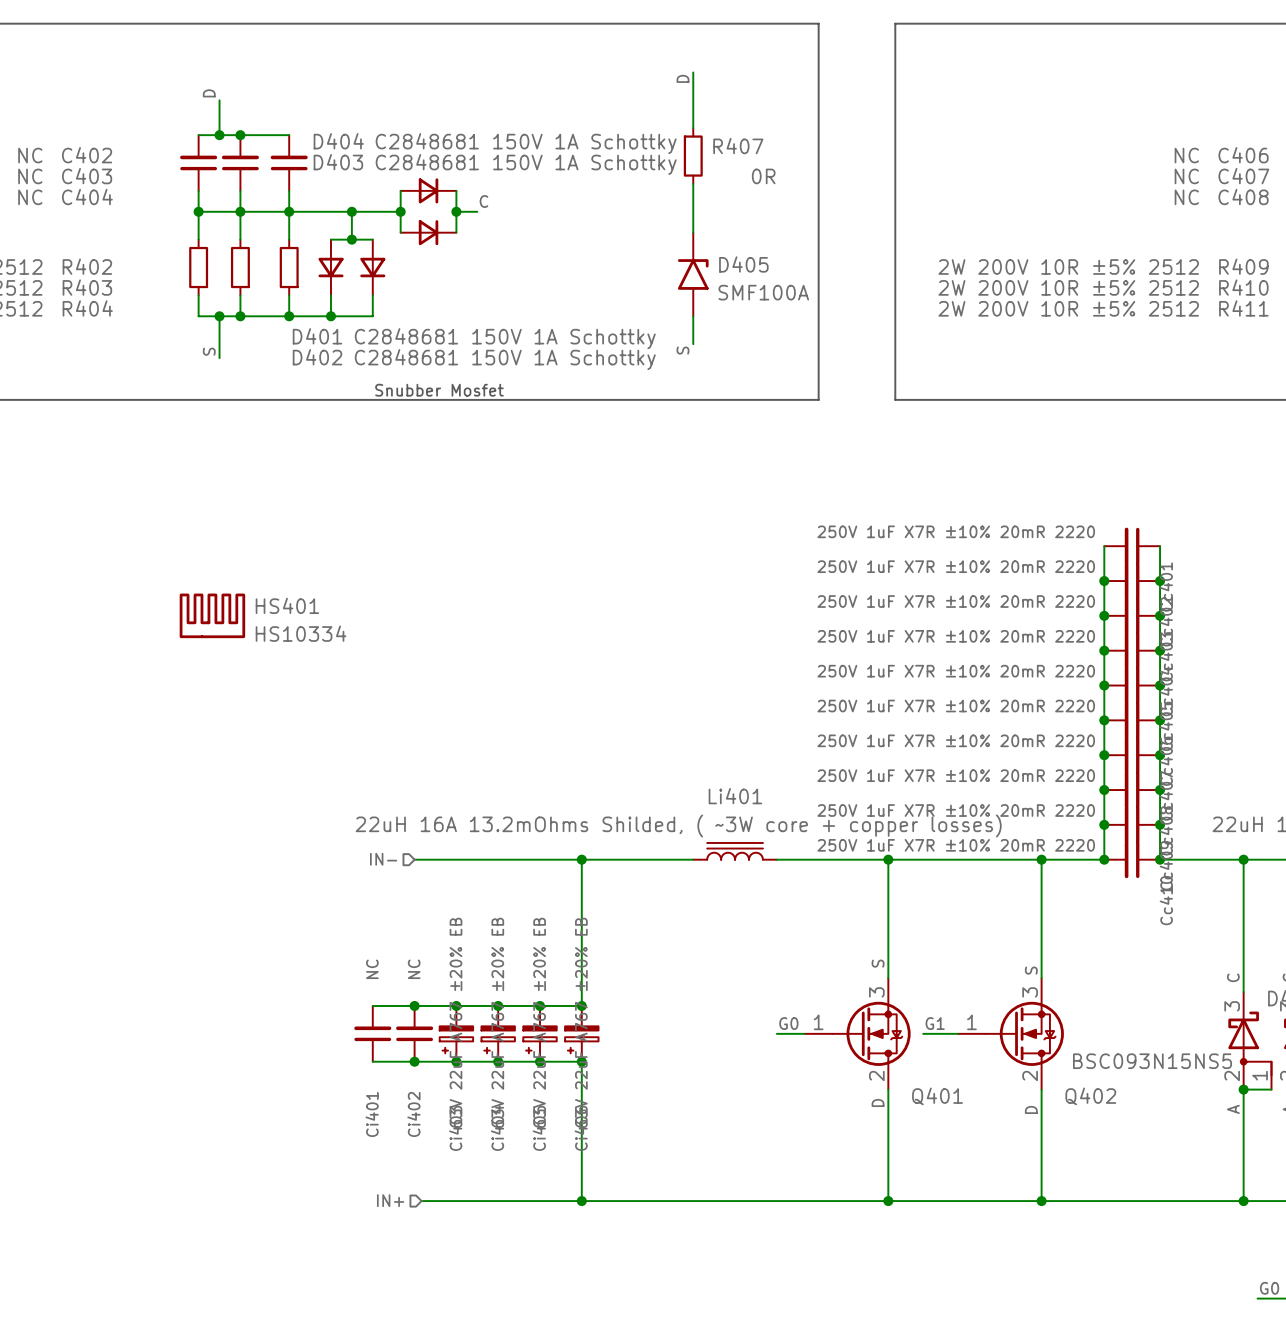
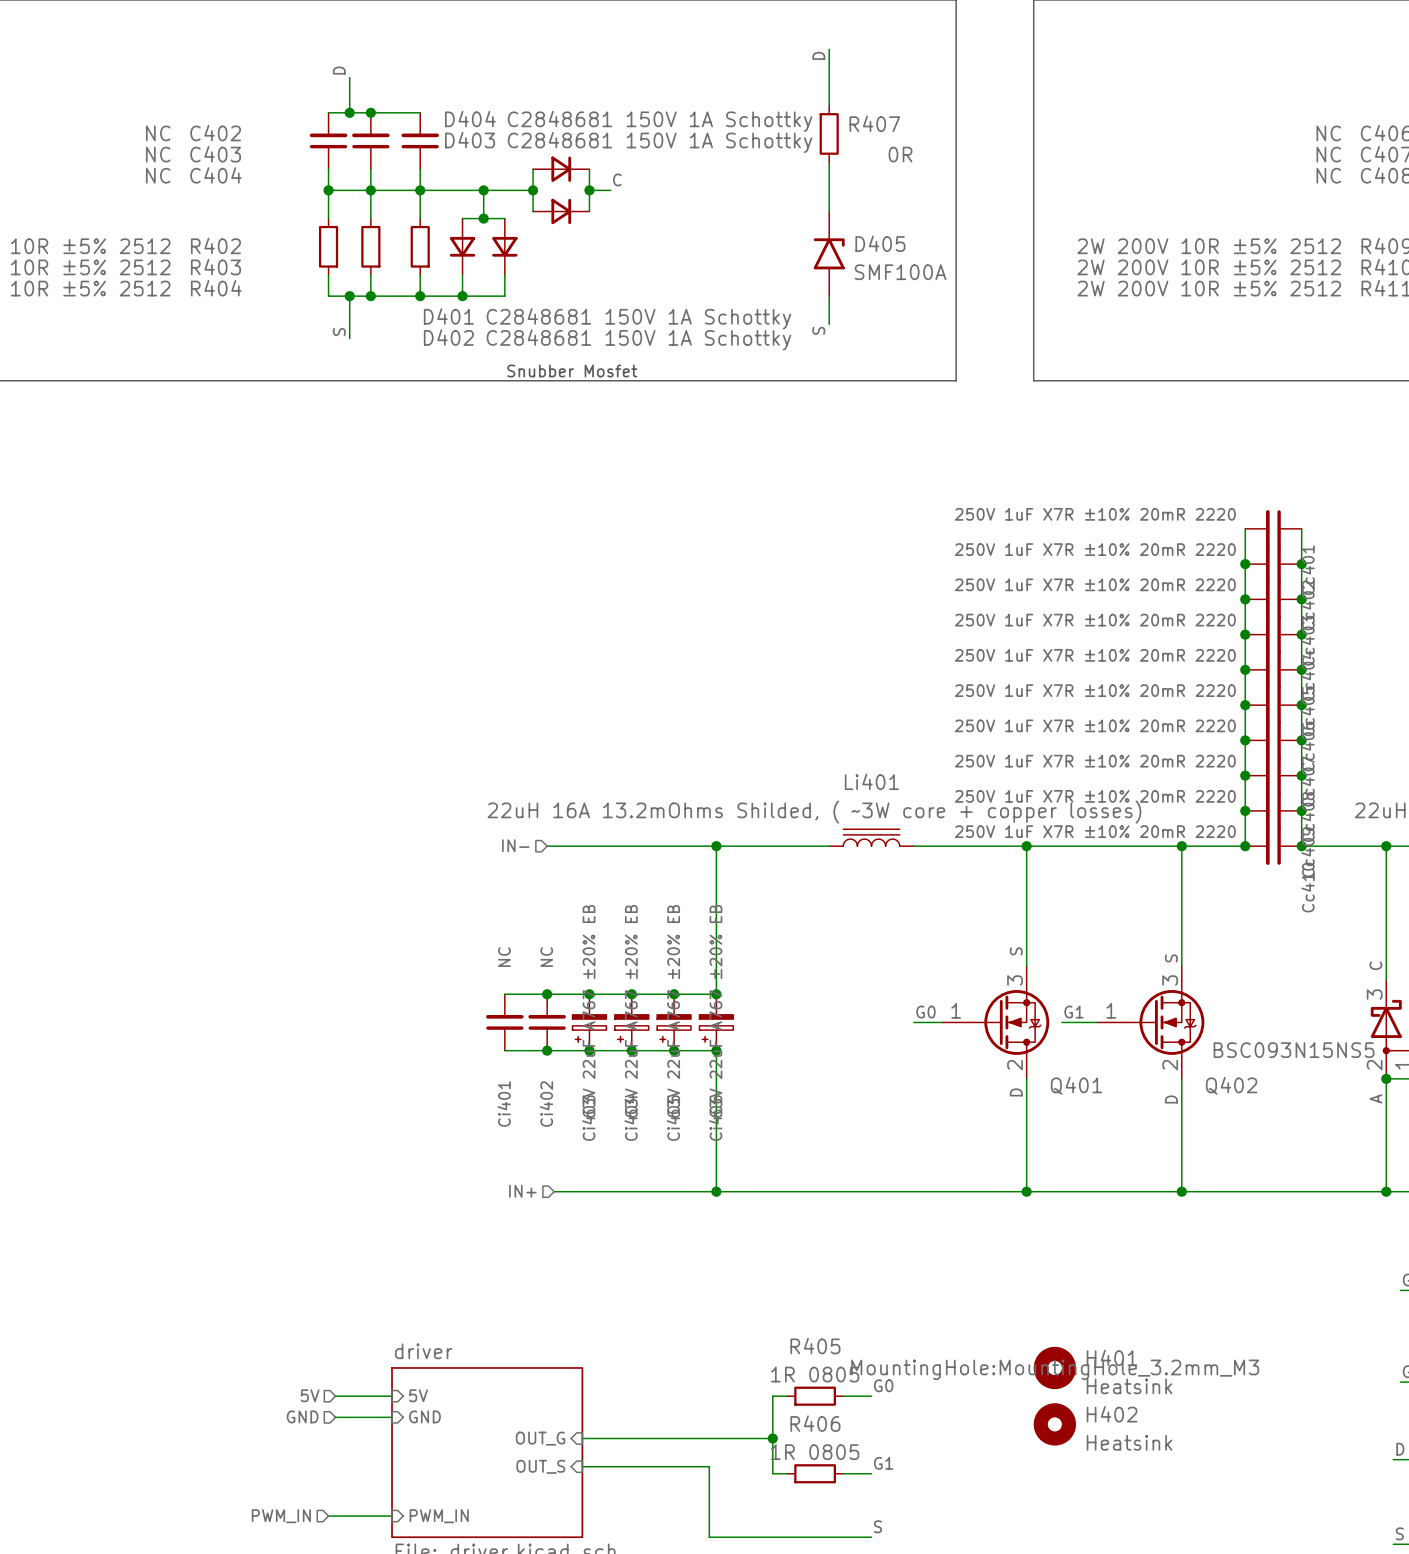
HS401: HS10334 (212, 615) -> none

